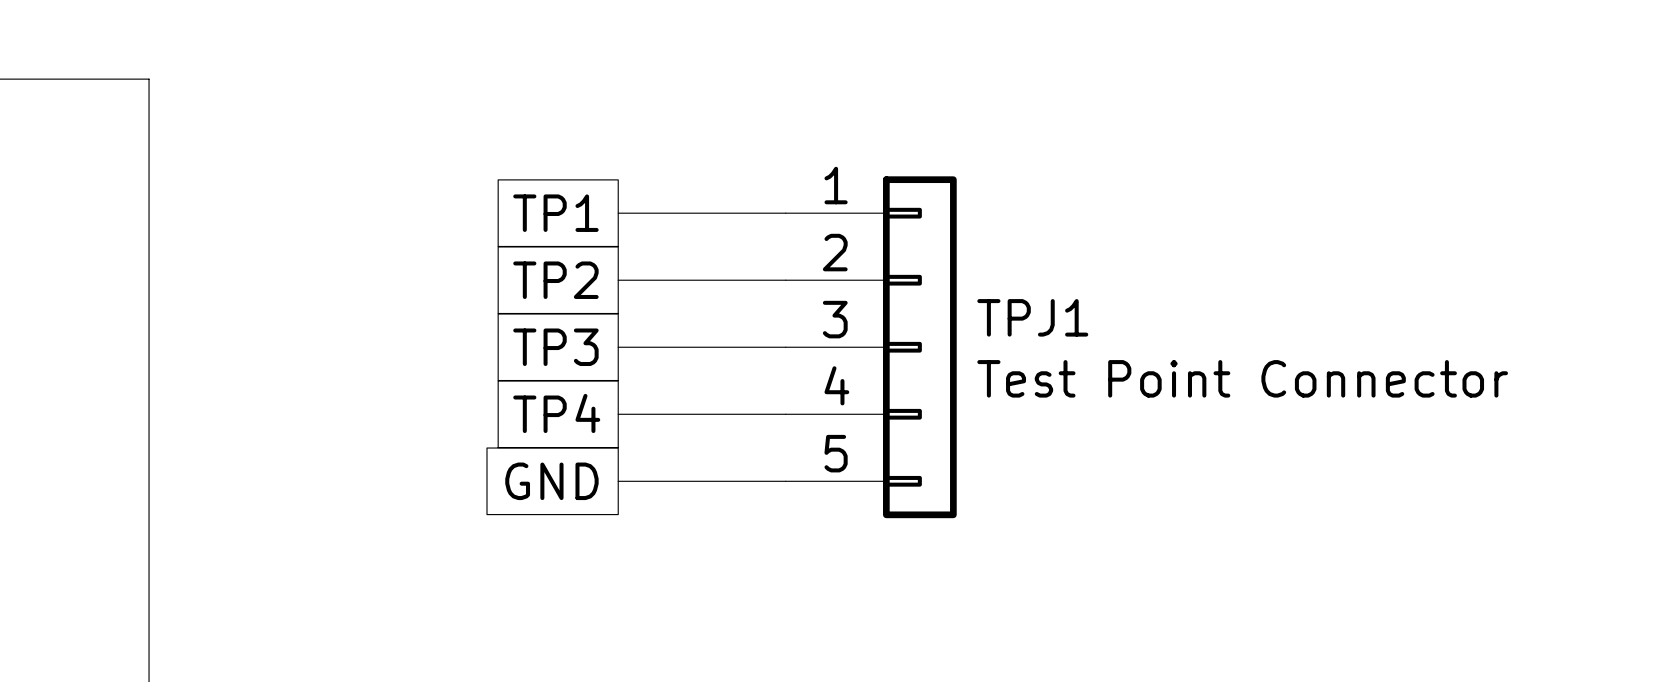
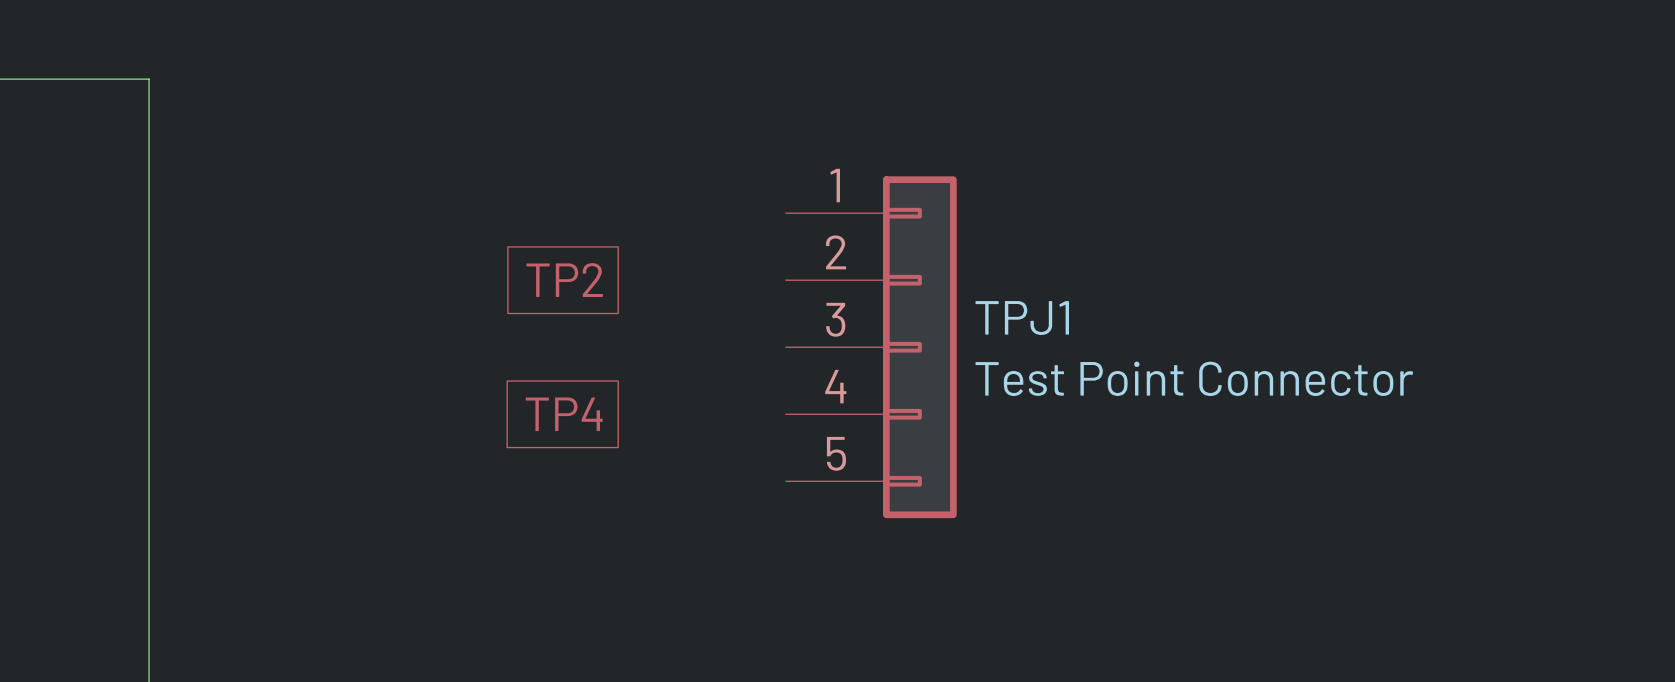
global label: TP1 (555, 213) -> none
wire: (618, 213) (785, 213) -> none
wire: (618, 280) (785, 280) -> none
global label: TP3 (555, 347) -> none
wire: (618, 347) (785, 347) -> none
wire: (618, 414) (785, 414) -> none
global label: GND (551, 481) -> none
wire: (618, 481) (785, 481) -> none

